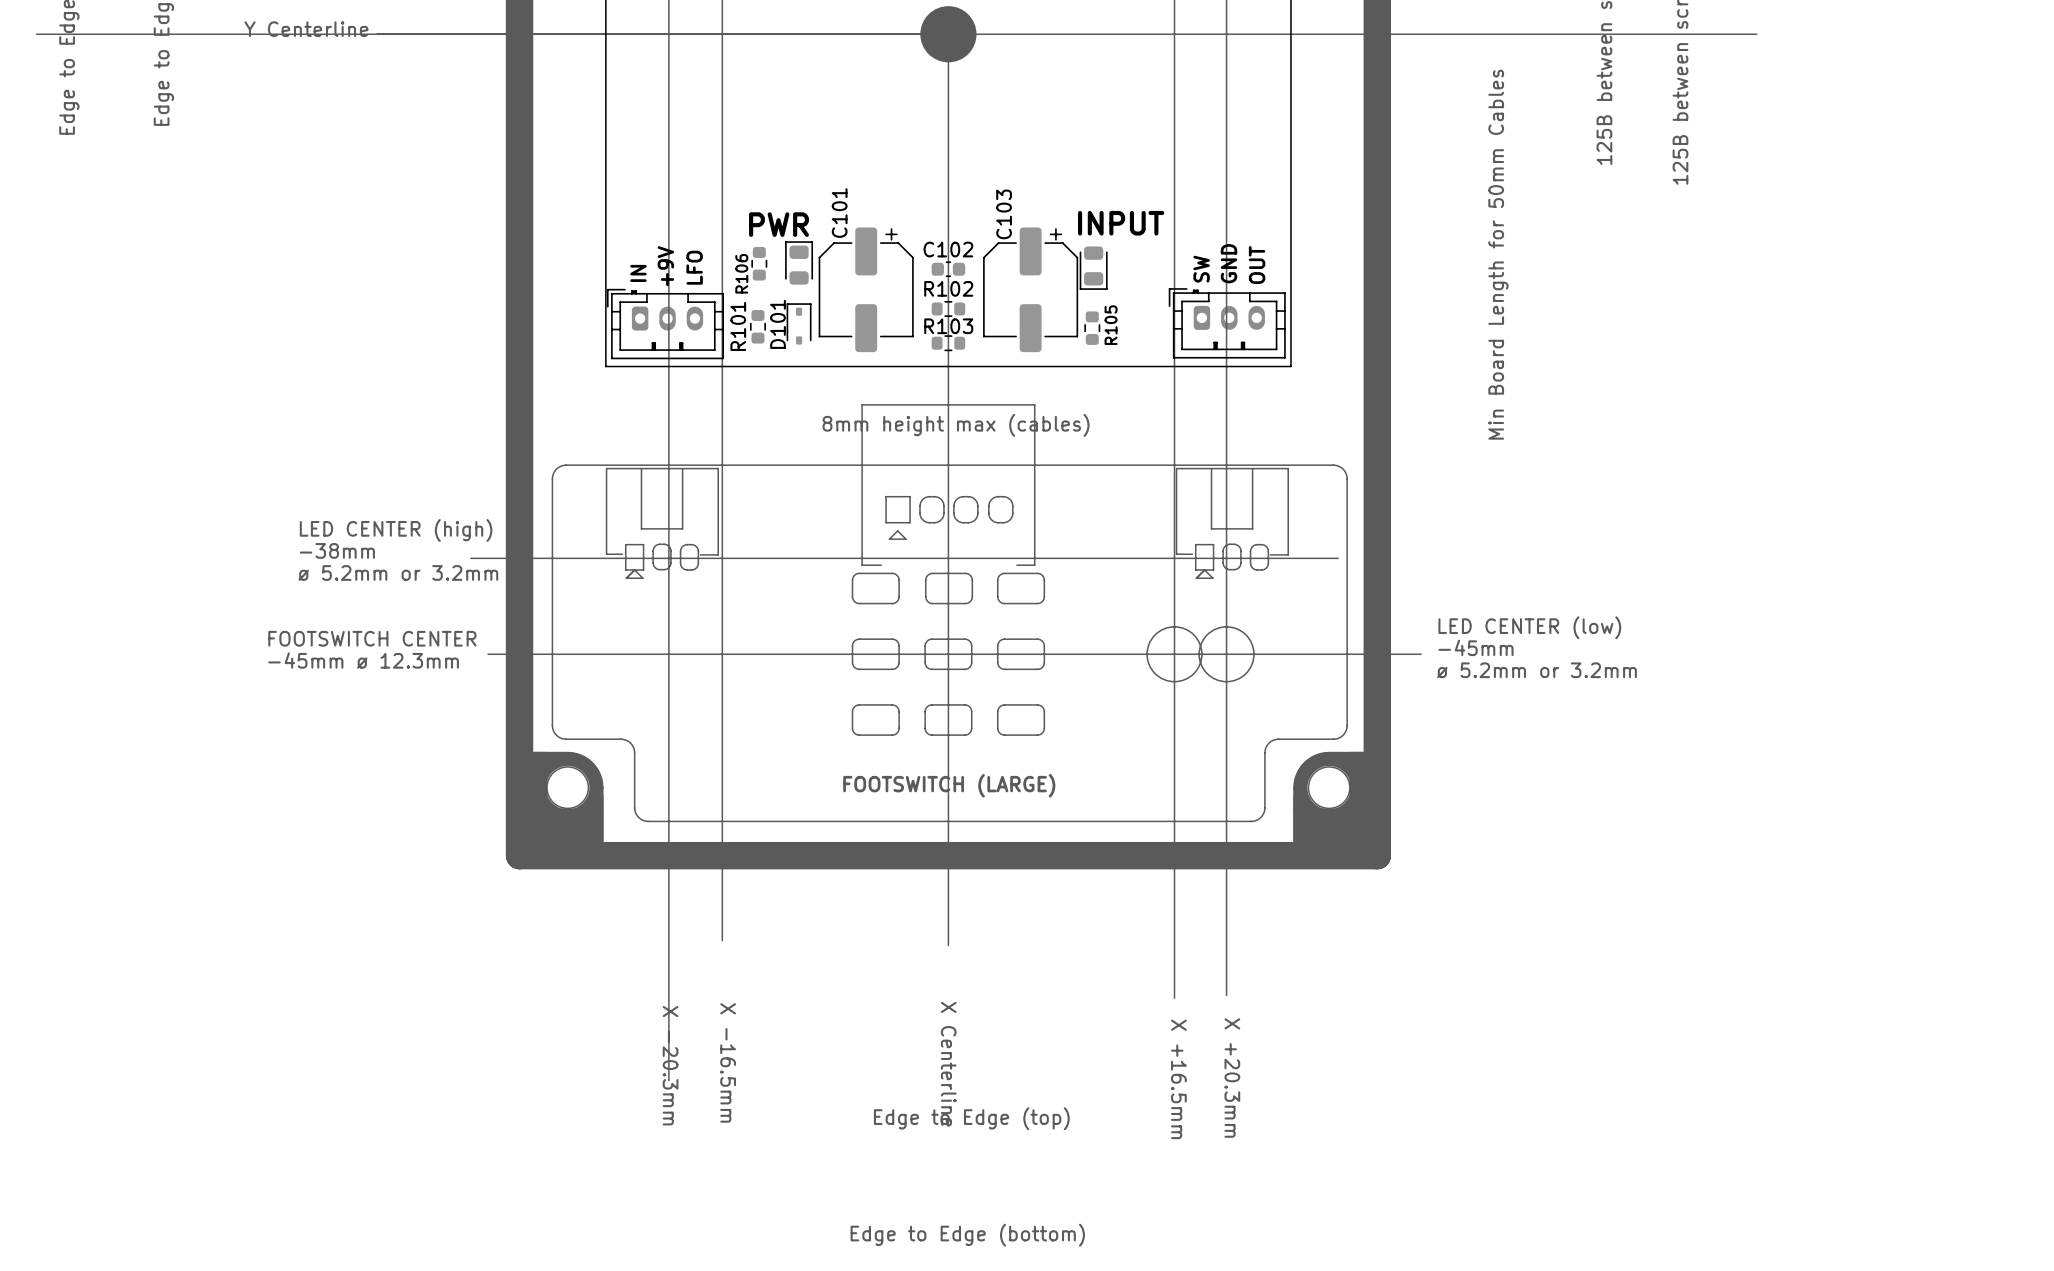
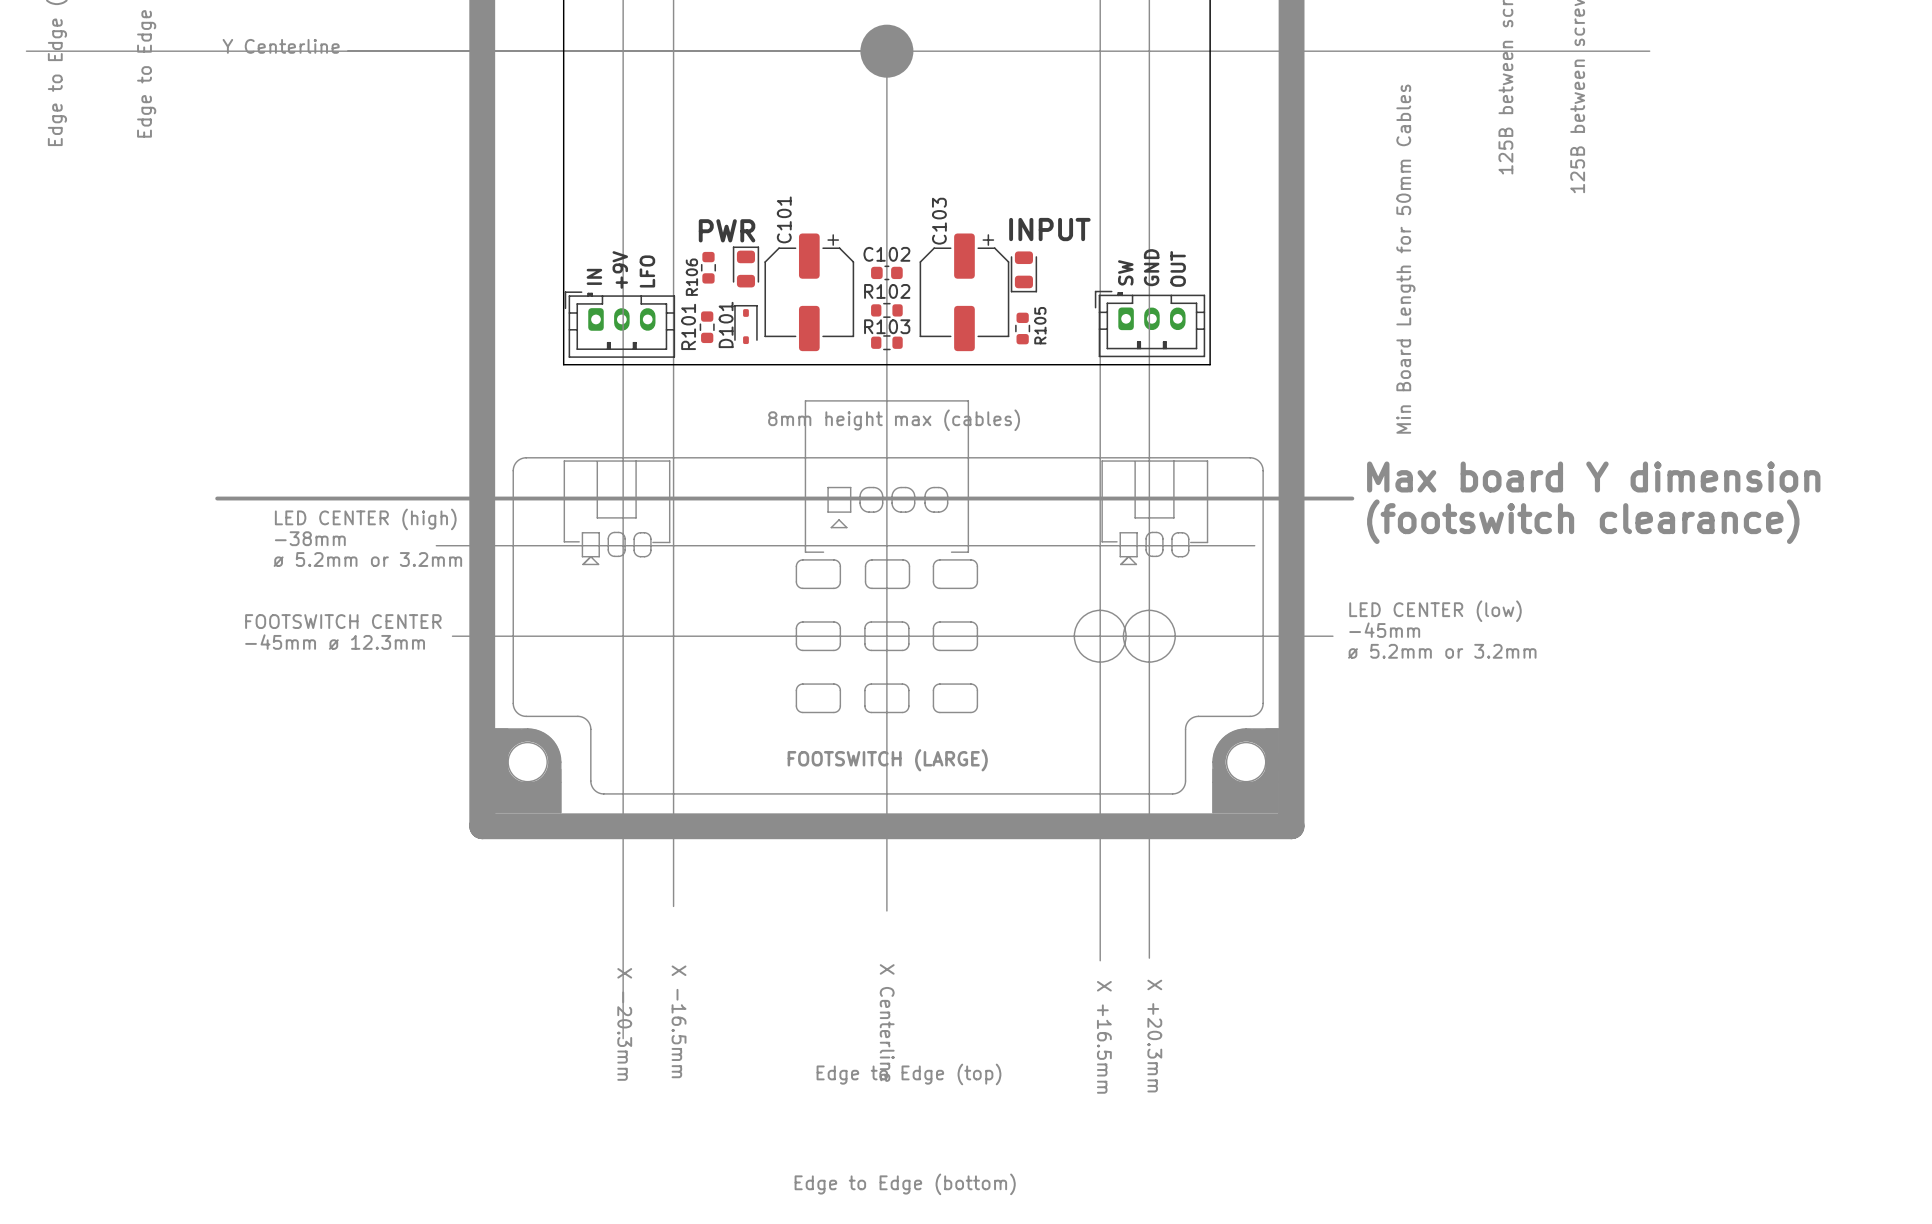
text: none -> Max board Y dimension (1593, 477)
line: none -> (217, 498) (1352, 498)
text: none -> (footswitch clearance) (1583, 521)

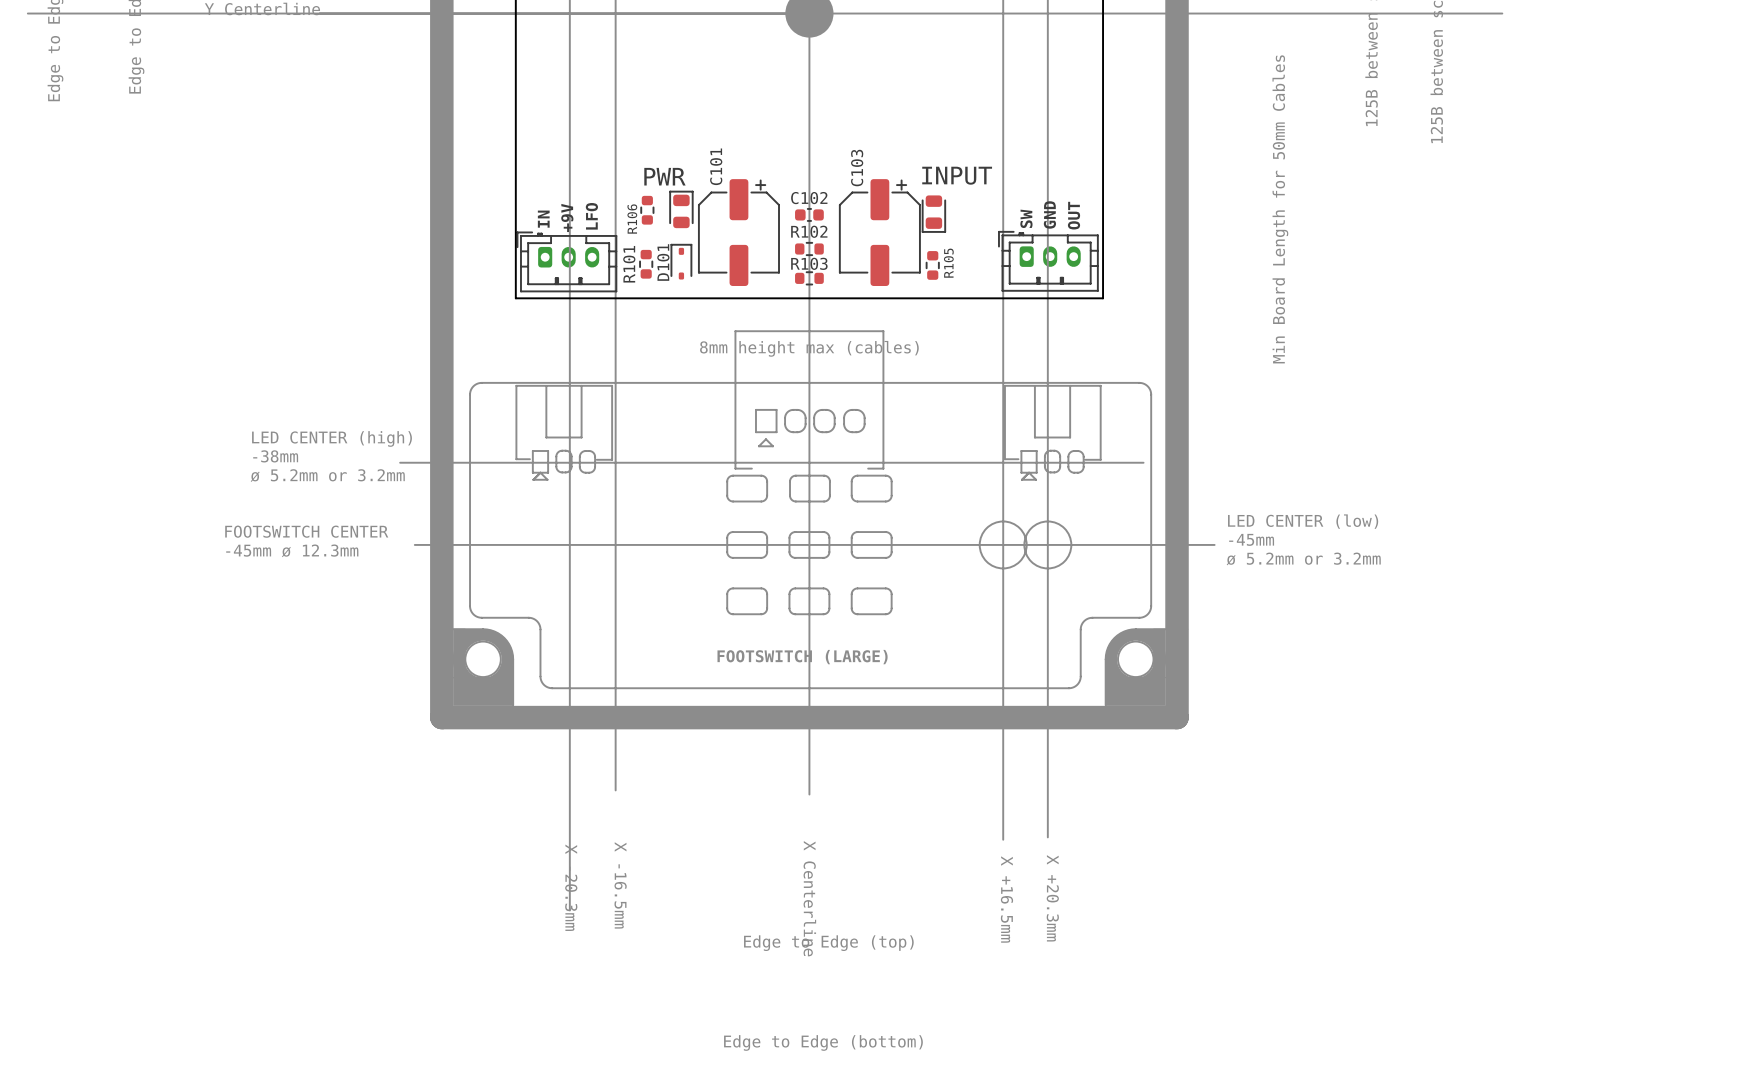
text: Max board Y dimension (1593, 477) -> none
line: (217, 498) (1352, 498) -> none
text: (footswitch clearance) (1583, 521) -> none

